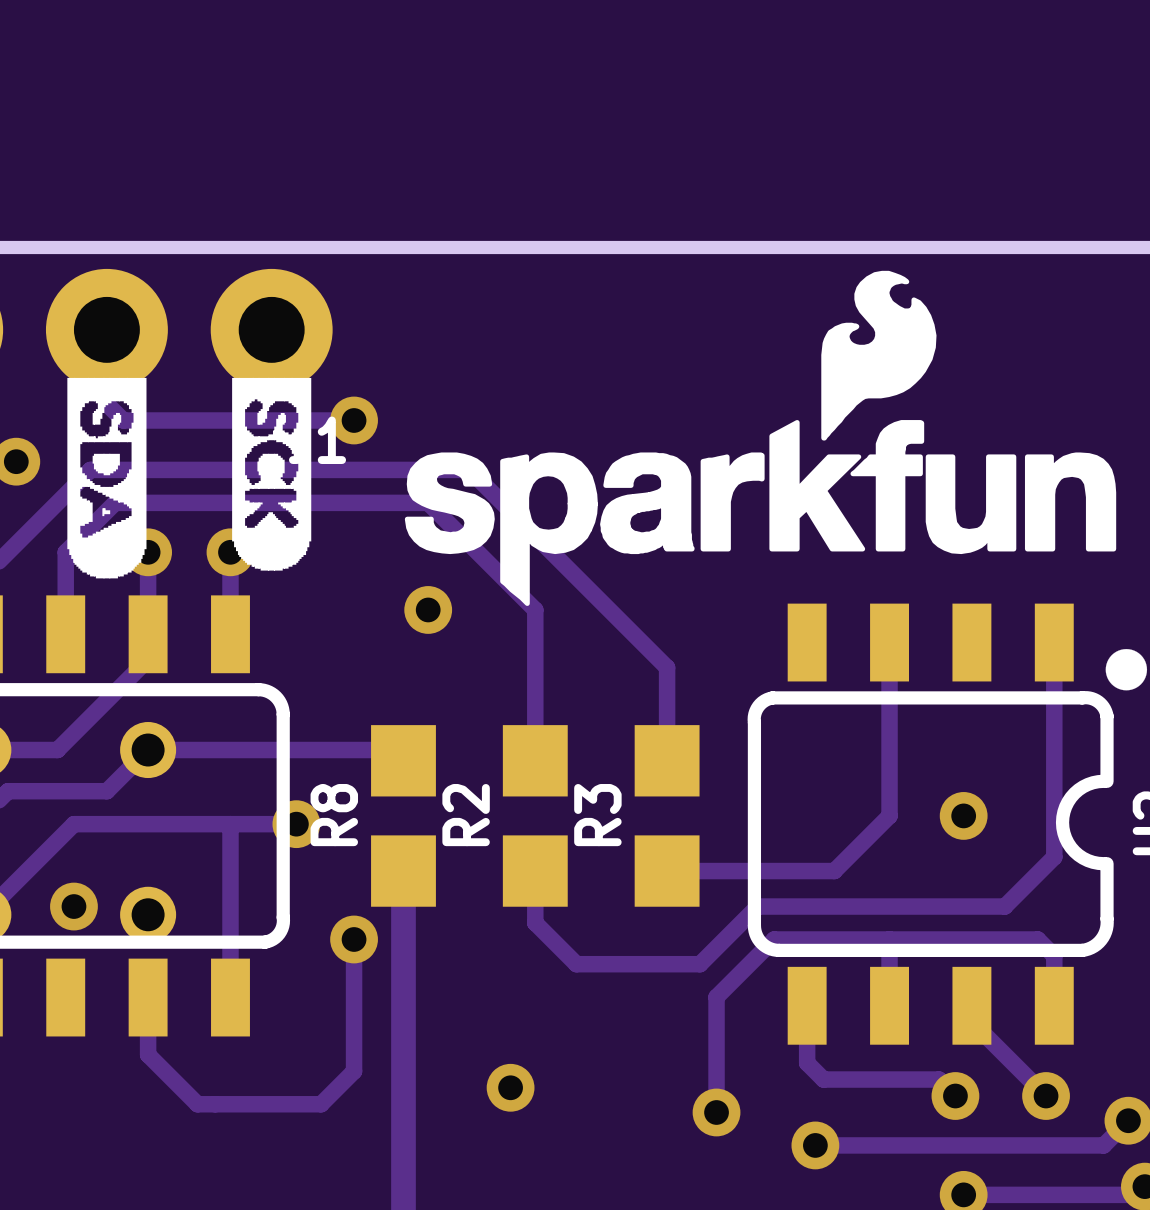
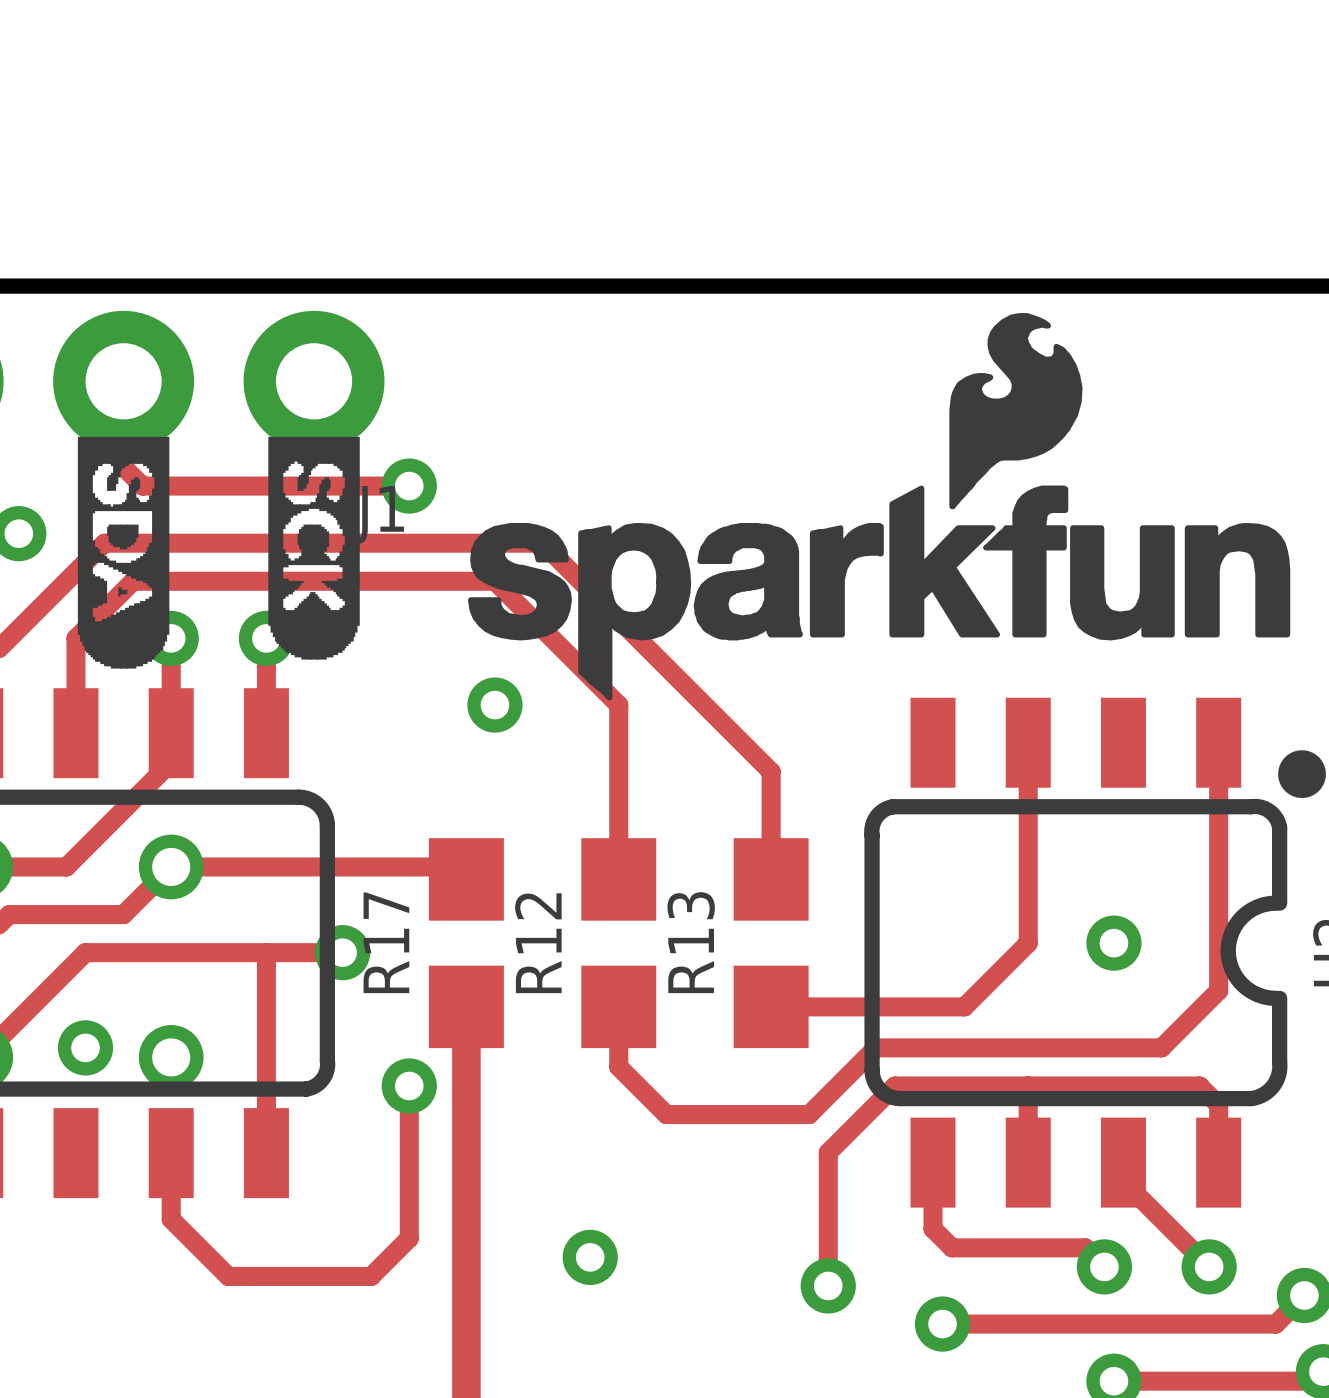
R8 name: R8 (334, 815) -> R17 (386, 942)
R2 name: R2 (466, 815) -> R12 (538, 943)
R3 name: R3 (597, 815) -> R13 (691, 942)

